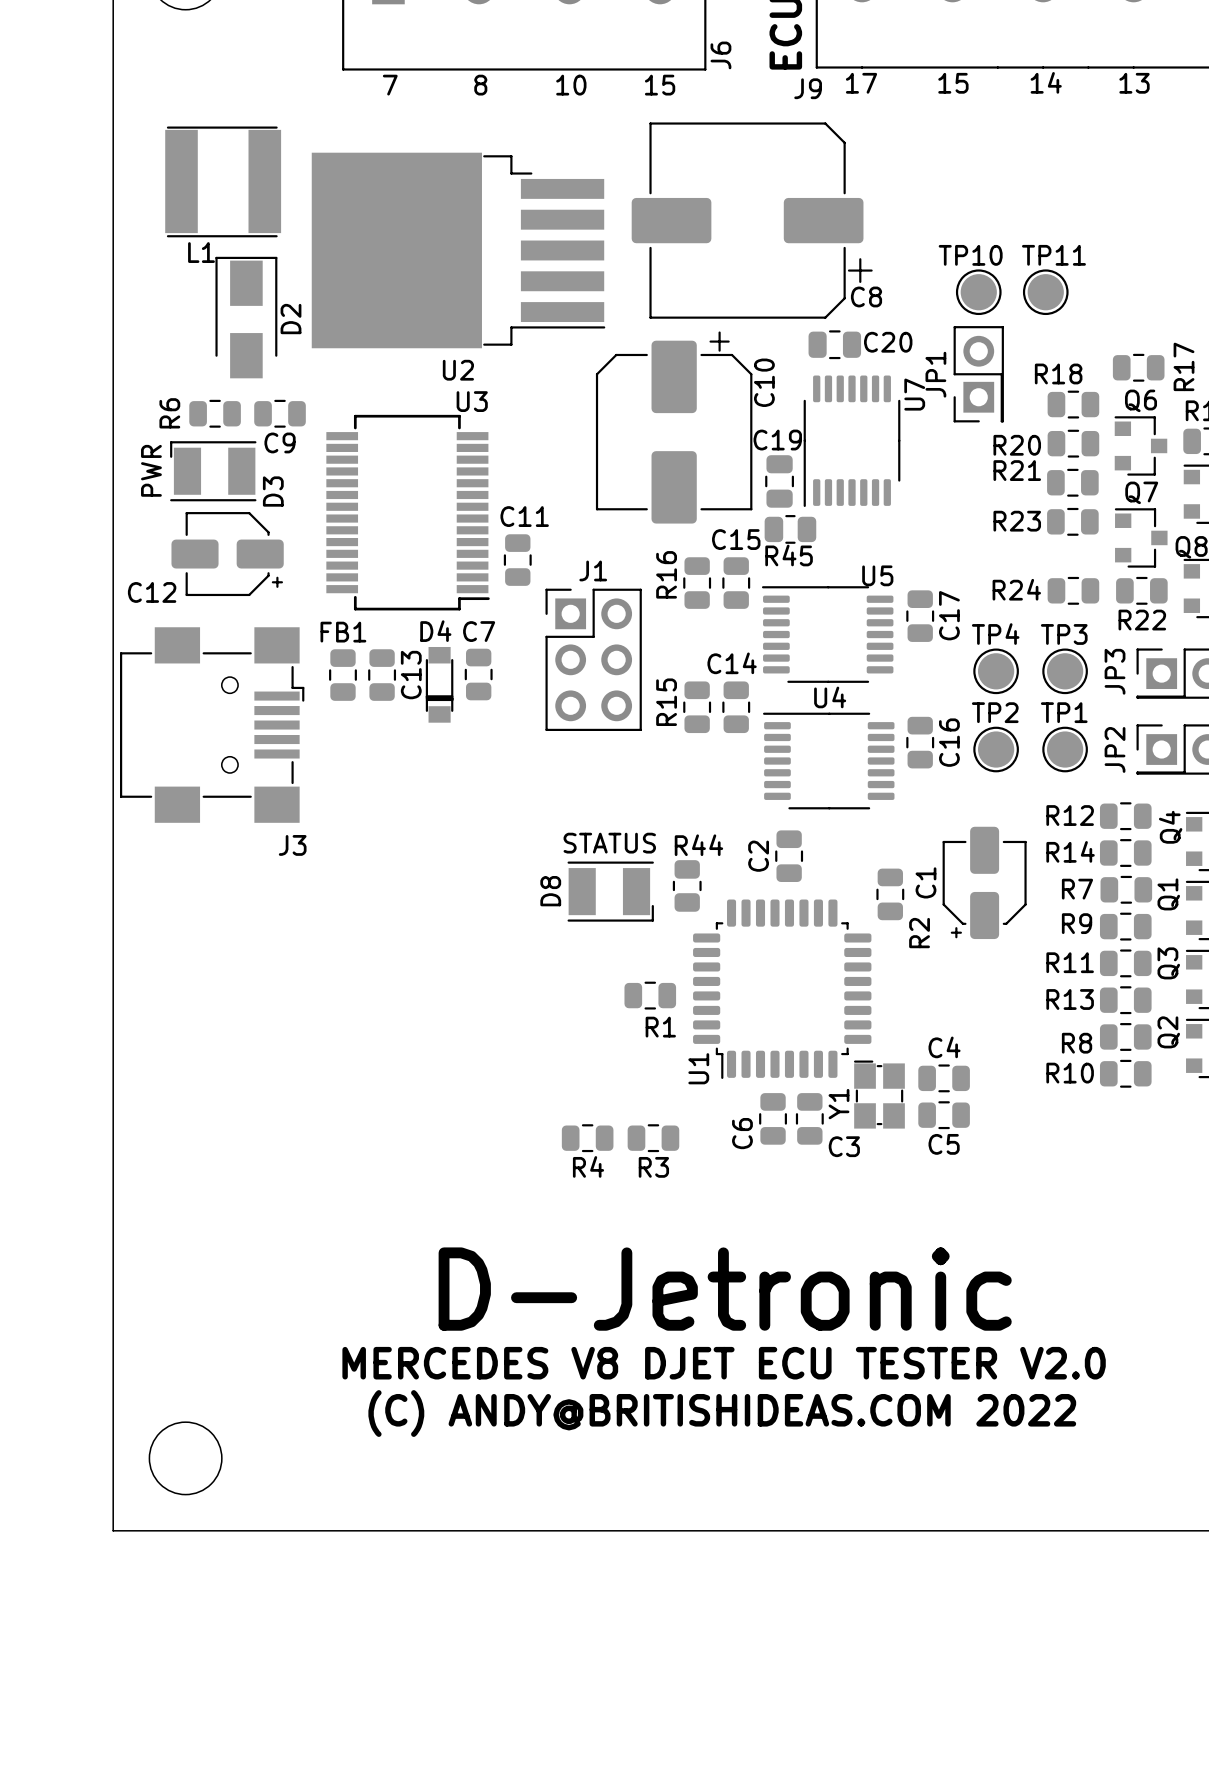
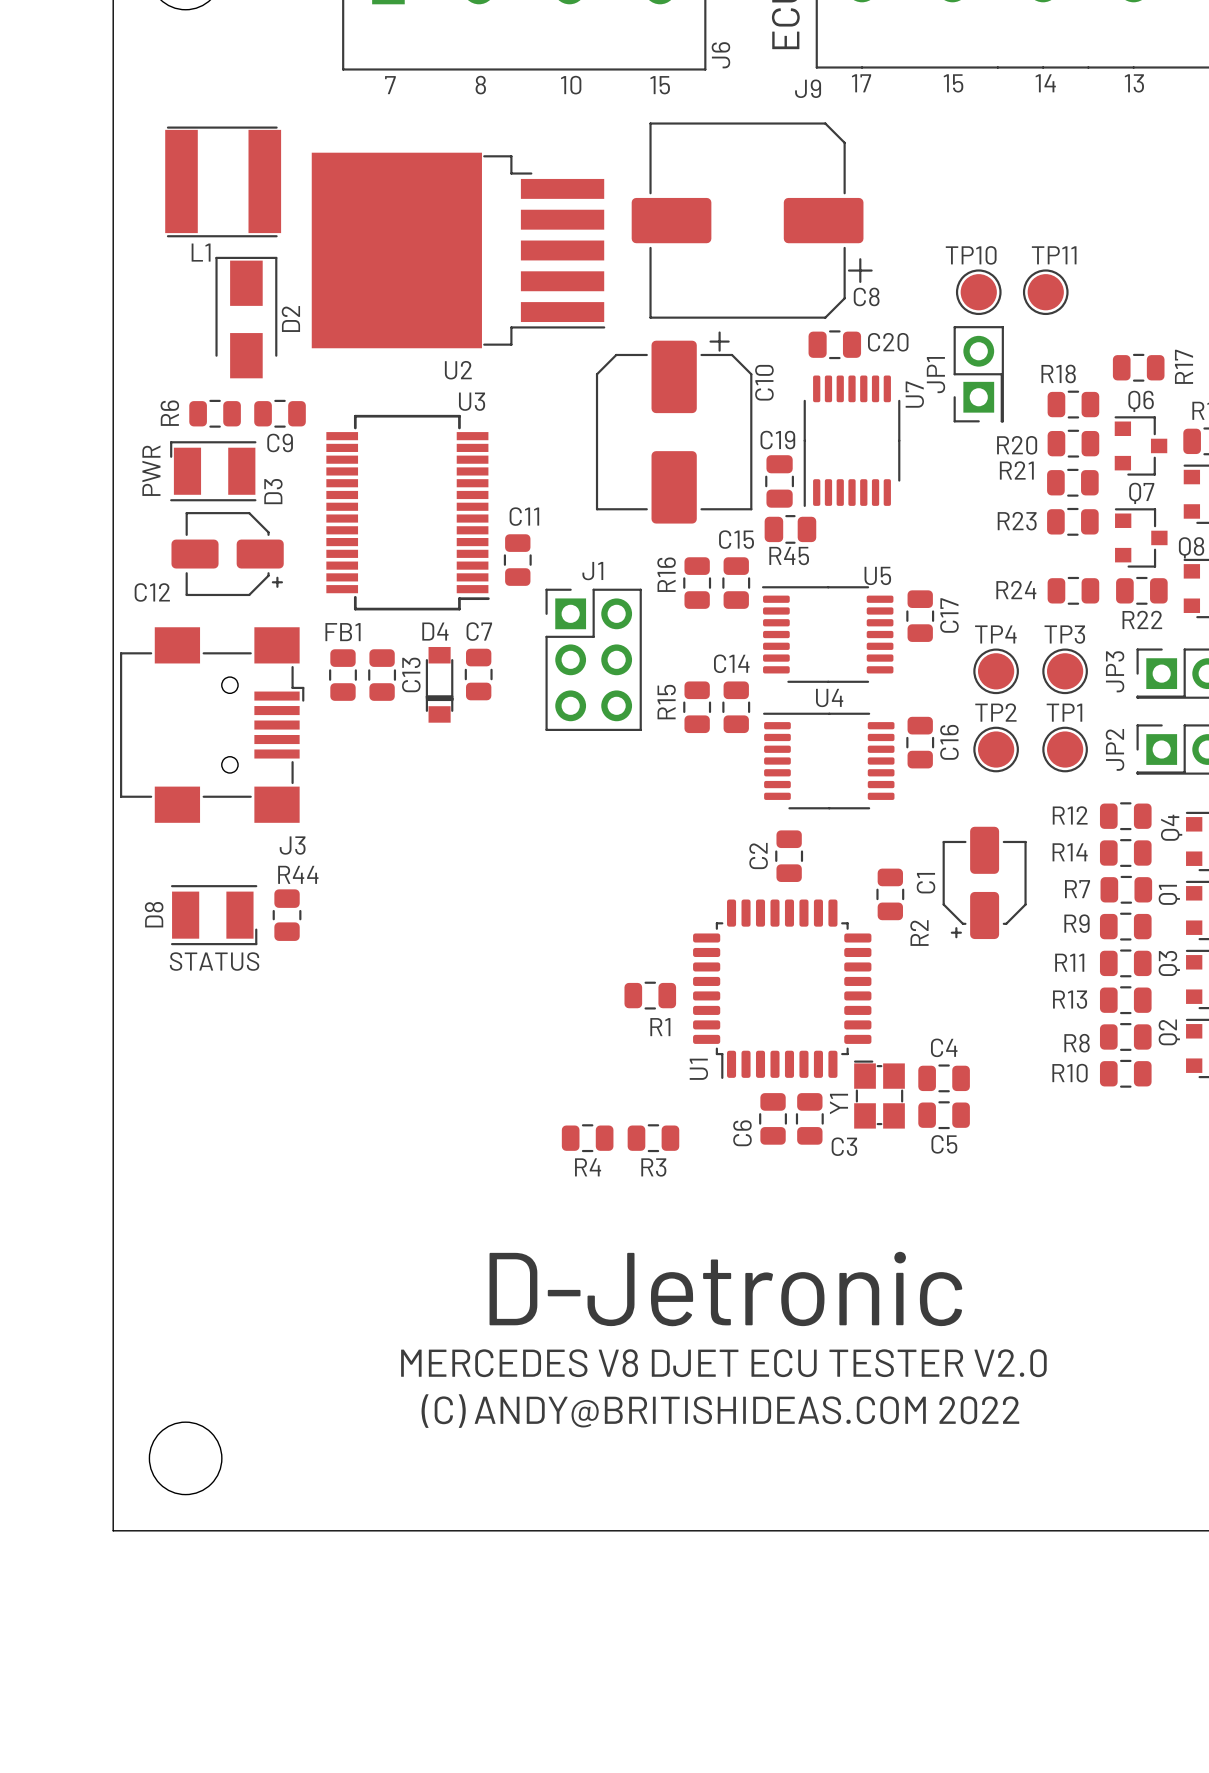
text position: STATUS (609, 843) -> STATUS (214, 961)
R44 position: (687, 885) -> (287, 915)
D8 position: (610, 891) -> (214, 915)

